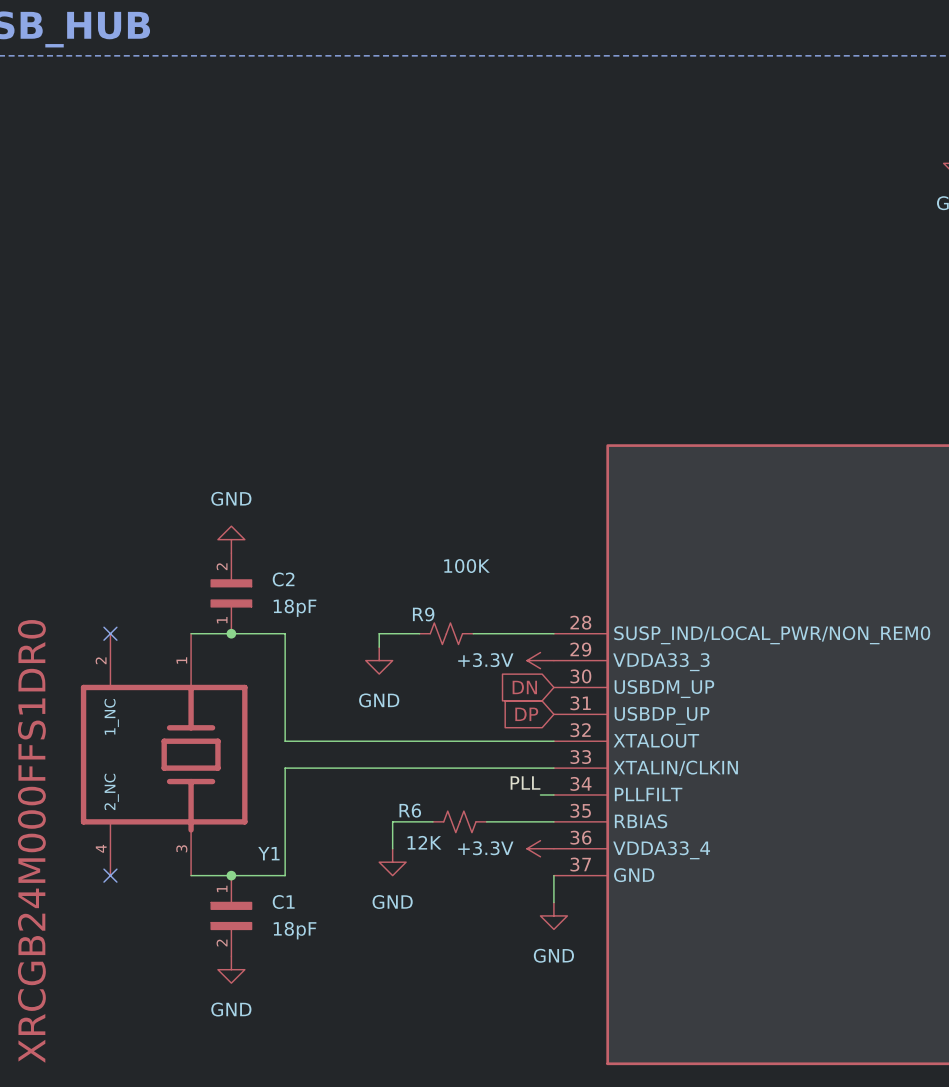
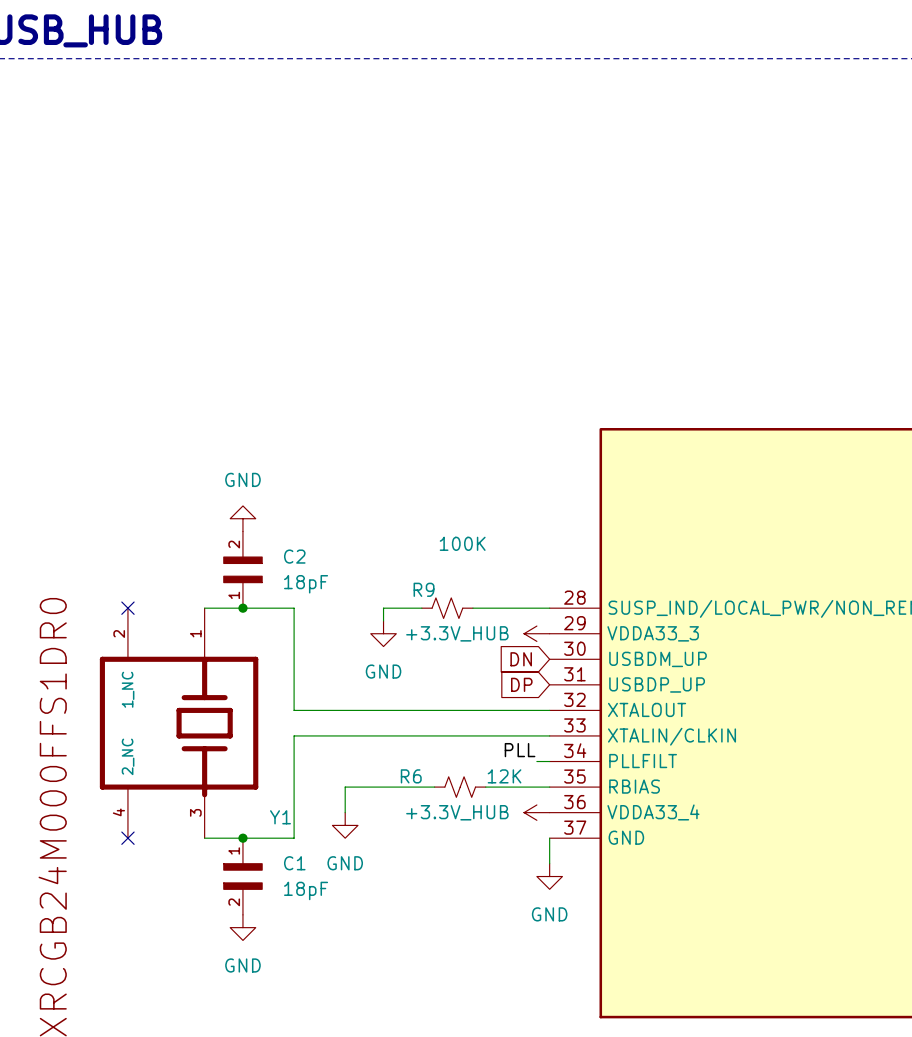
power symbol: +3.3V (540, 660) -> +3.3V_HUB (536, 633)
wire: (392, 821) (392, 848) -> (396, 787) (345, 787) (345, 812)
R6 value position: 12K (424, 842) -> 12K (504, 776)
power symbol: +3.3V (540, 848) -> +3.3V_HUB (536, 812)
power symbol position: GND (392, 862) -> GND (345, 825)

